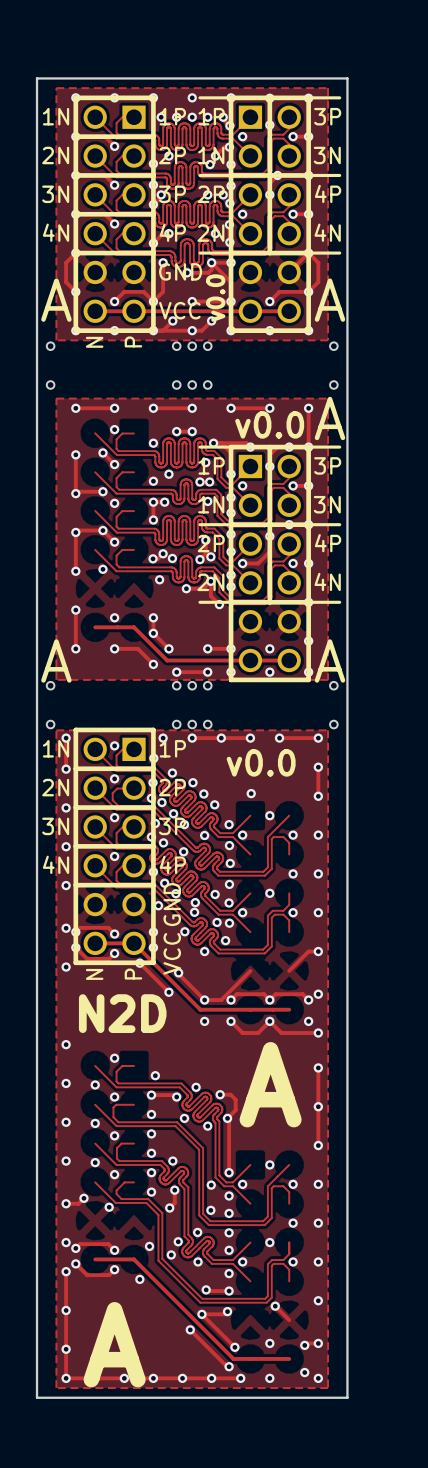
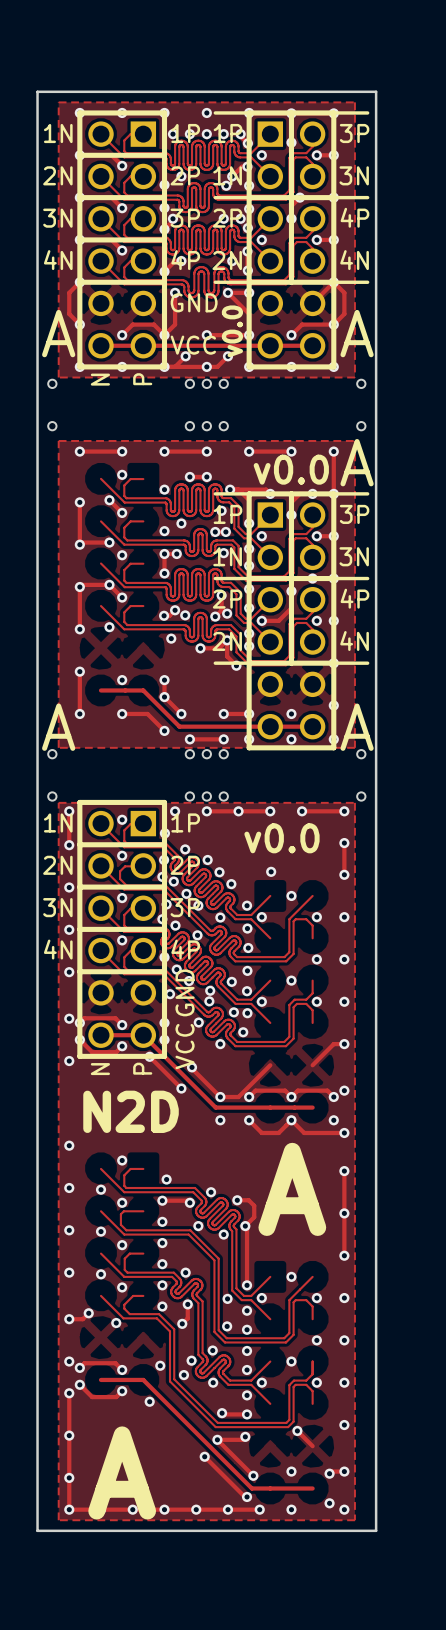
track: (211, 262) (211, 269) (208, 272) (187, 272) -> none
via: (187, 272) -> none

